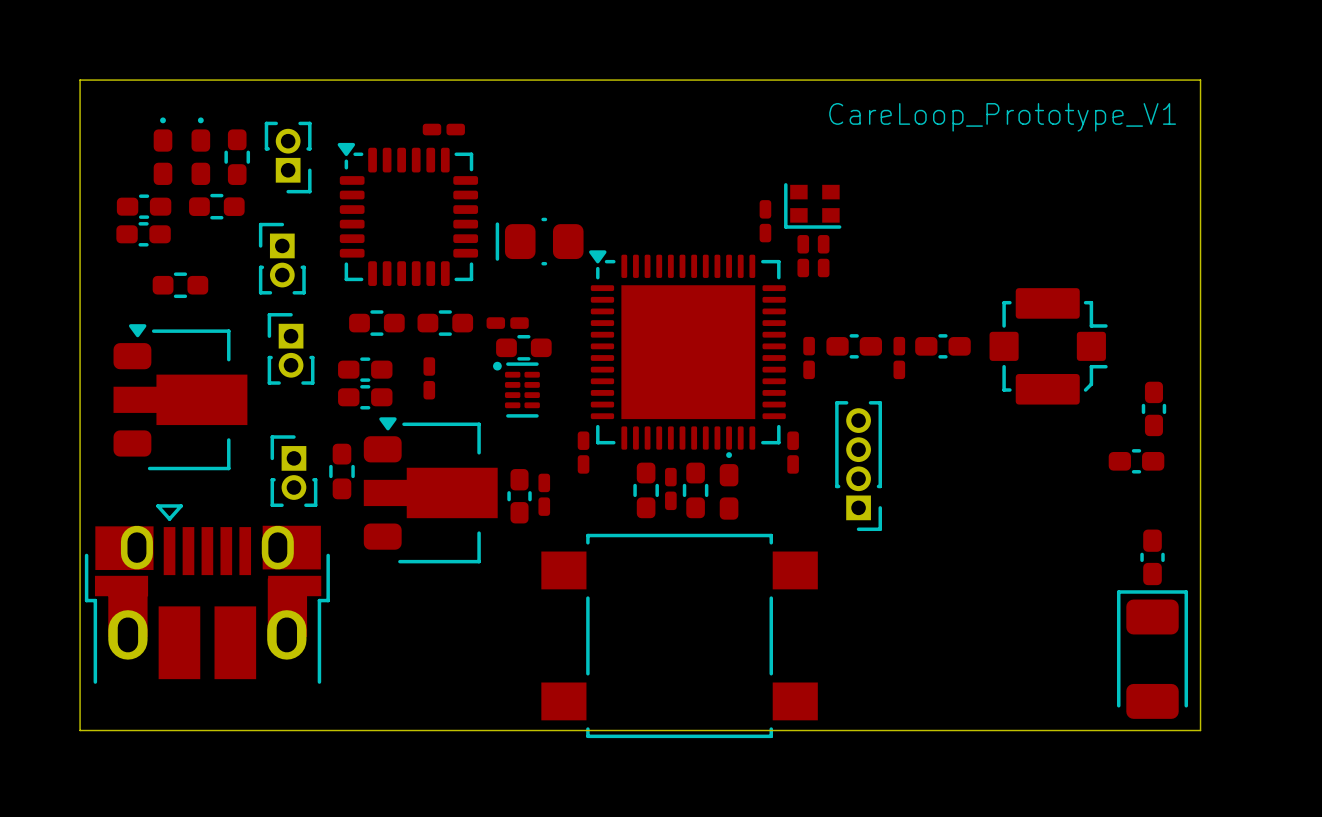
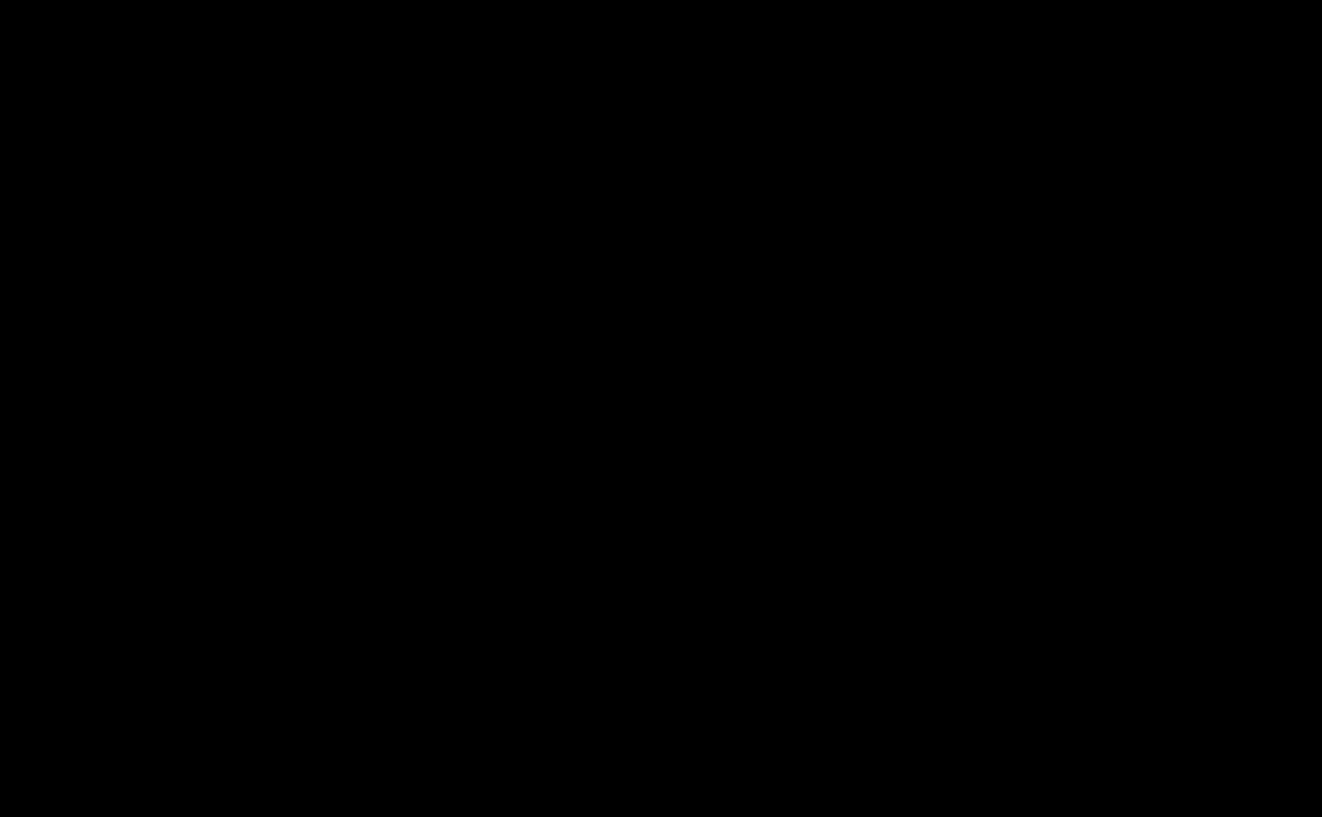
board edge: (80, 80) (1200, 80) (1200, 730) (80, 730) (80, 80) -> none
text: CareLoop_Prototype_V1 (1002, 117) -> none
part: (443, 129) -> none
part: (163, 151) -> none
part: (200, 151) -> none
part: (237, 157) -> none
part: (288, 157) -> none
part: (812, 205) -> none
part: (144, 206) -> none
part: (216, 206) -> none
part: (407, 214) -> none
part: (765, 221) -> none
part: (143, 234) -> none
part: (539, 241) -> none
part: (803, 256) -> none
part: (823, 256) -> none
part: (282, 258) -> none
part: (180, 285) -> none
part: (376, 323) -> none
part: (445, 323) -> none
part: (507, 323) -> none
part: (854, 346) -> none
part: (942, 346) -> none
part: (1048, 346) -> none
part: (523, 347) -> none
part: (291, 348) -> none
part: (687, 349) -> none
part: (809, 357) -> none
part: (899, 357) -> none
part: (365, 369) -> none
part: (429, 378) -> none
part: (516, 389) -> none
part: (180, 397) -> none
part: (365, 397) -> none
part: (1153, 408) -> none
part: (583, 452) -> none
part: (793, 452) -> none
part: (1136, 461) -> none
part: (858, 466) -> none
part: (293, 471) -> none
part: (341, 471) -> none
part: (729, 485) -> none
part: (670, 488) -> none
part: (430, 490) -> none
part: (646, 490) -> none
part: (695, 490) -> none
part: (544, 494) -> none
part: (519, 496) -> none
part: (1152, 557) -> none
part: (207, 594) -> none
part: (679, 635) -> none
part: (1152, 654) -> none

